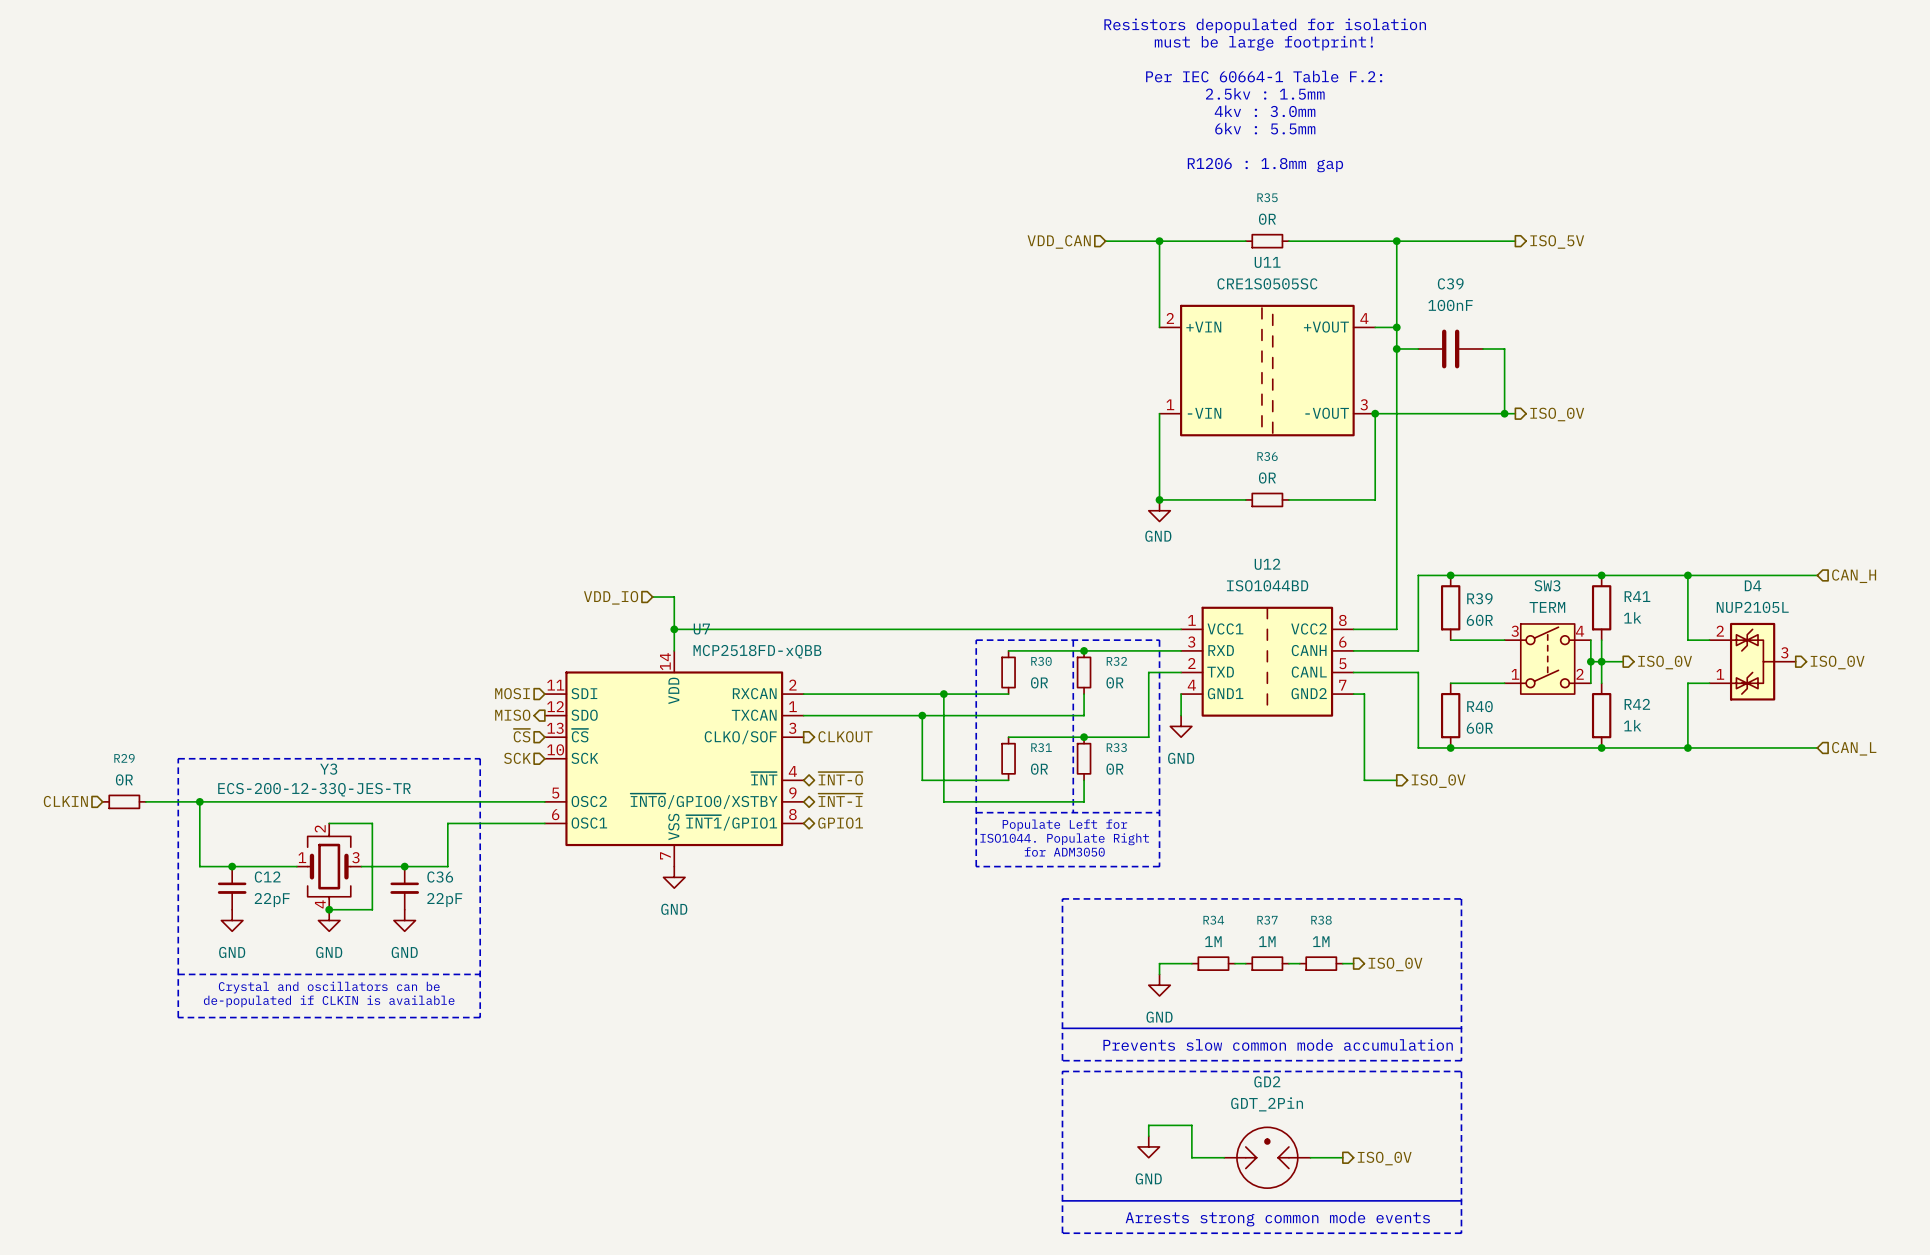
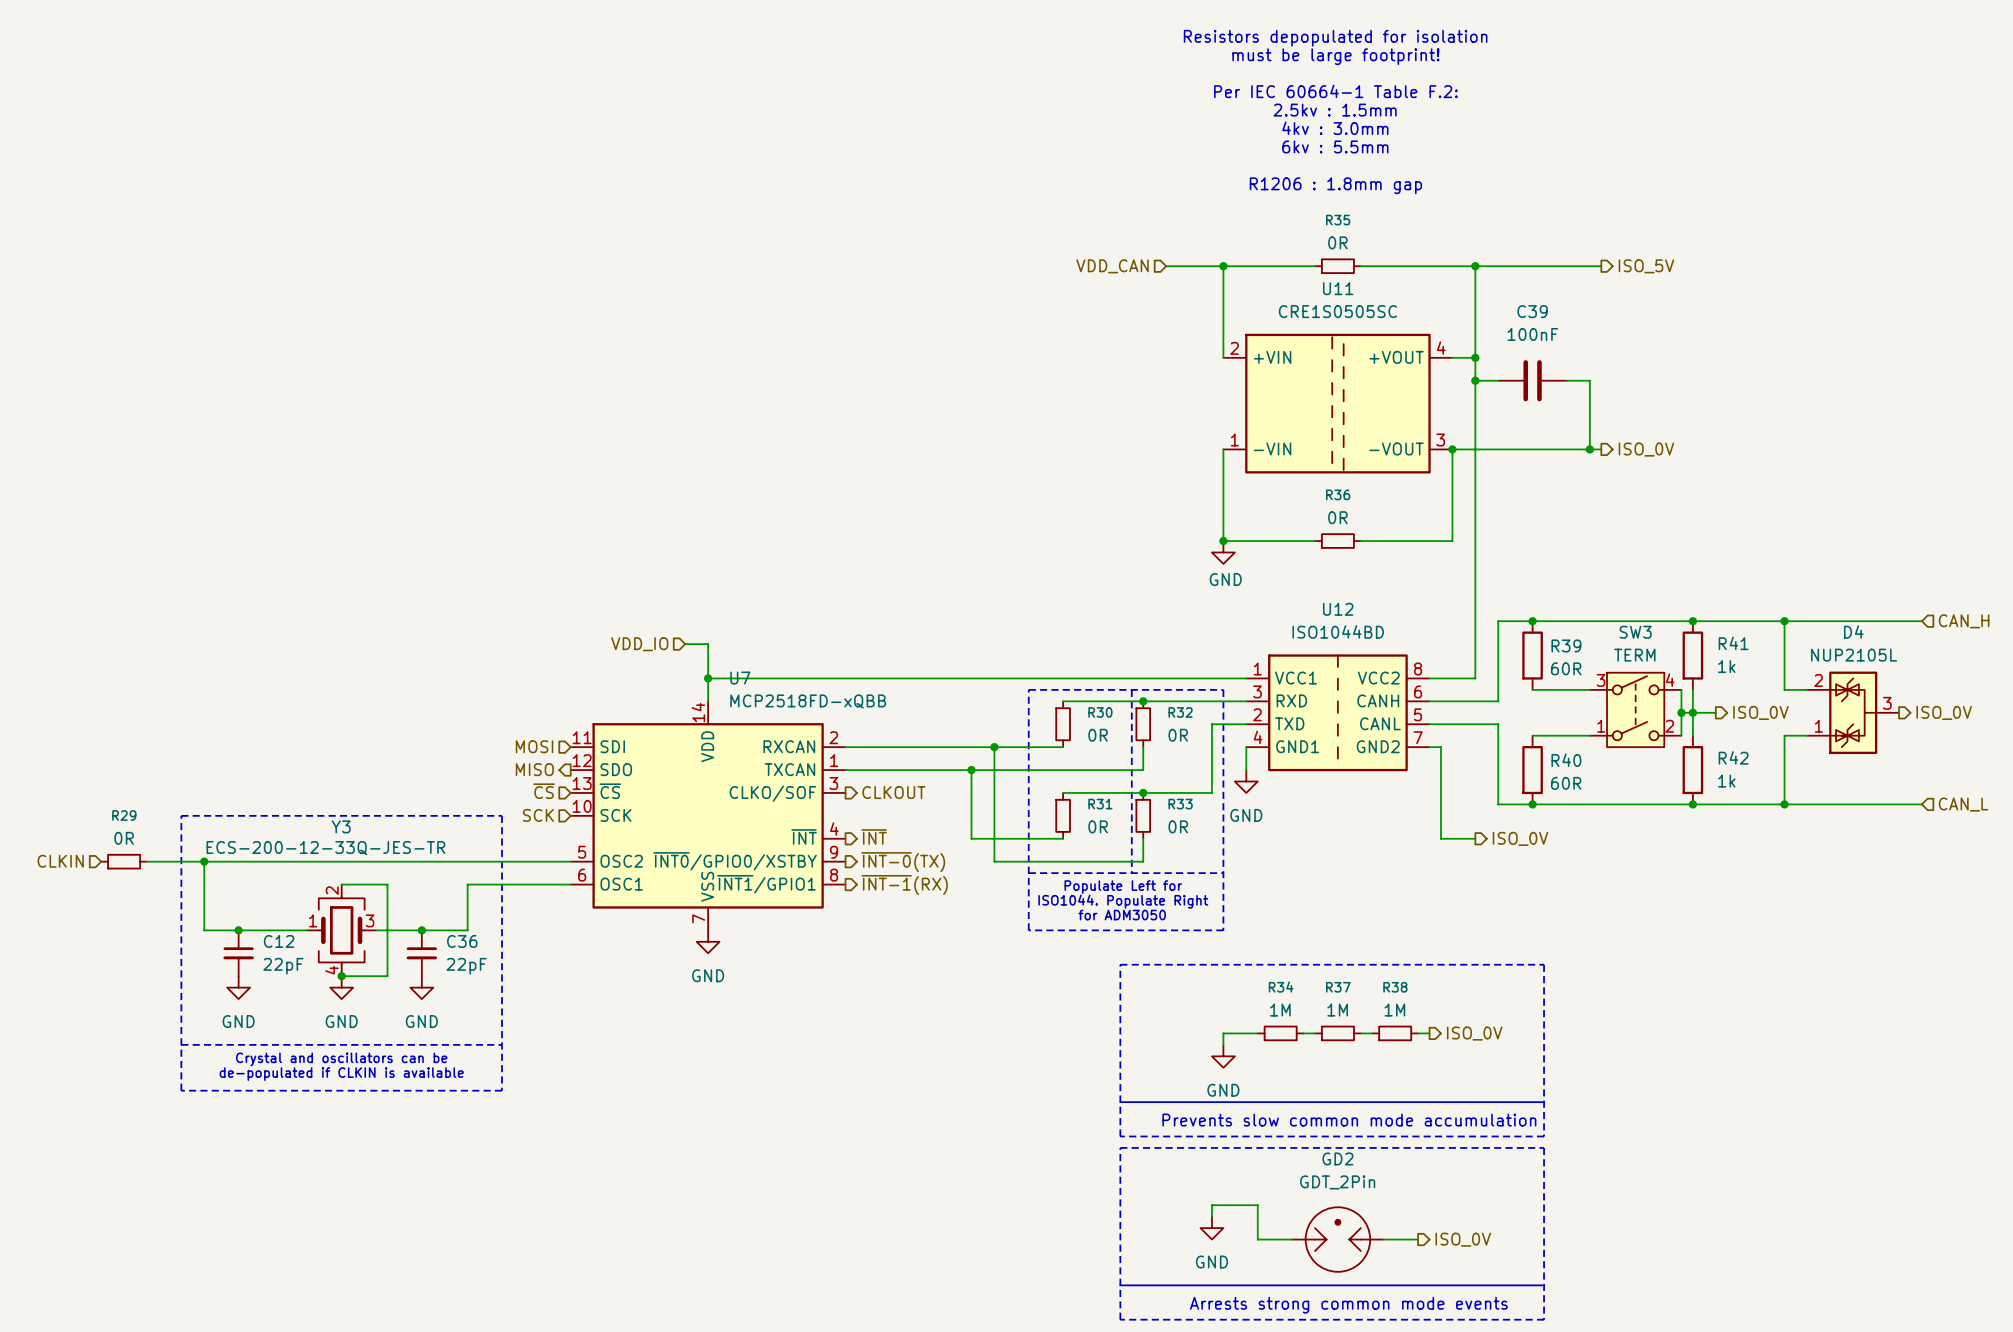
hierarchical label shape: bidirectional (840, 778) -> output (874, 837)
hierarchical label: ~{INT-O} (840, 778) -> ~{INT} (874, 837)
hierarchical label shape: bidirectional (840, 800) -> output (903, 862)
hierarchical label: ~{INT-I} (840, 800) -> ~{INT-0}(TX) (903, 862)
hierarchical label shape: bidirectional (840, 823) -> output (904, 885)
hierarchical label: GPIO1 (840, 823) -> ~{INT-1}(RX) (904, 885)

